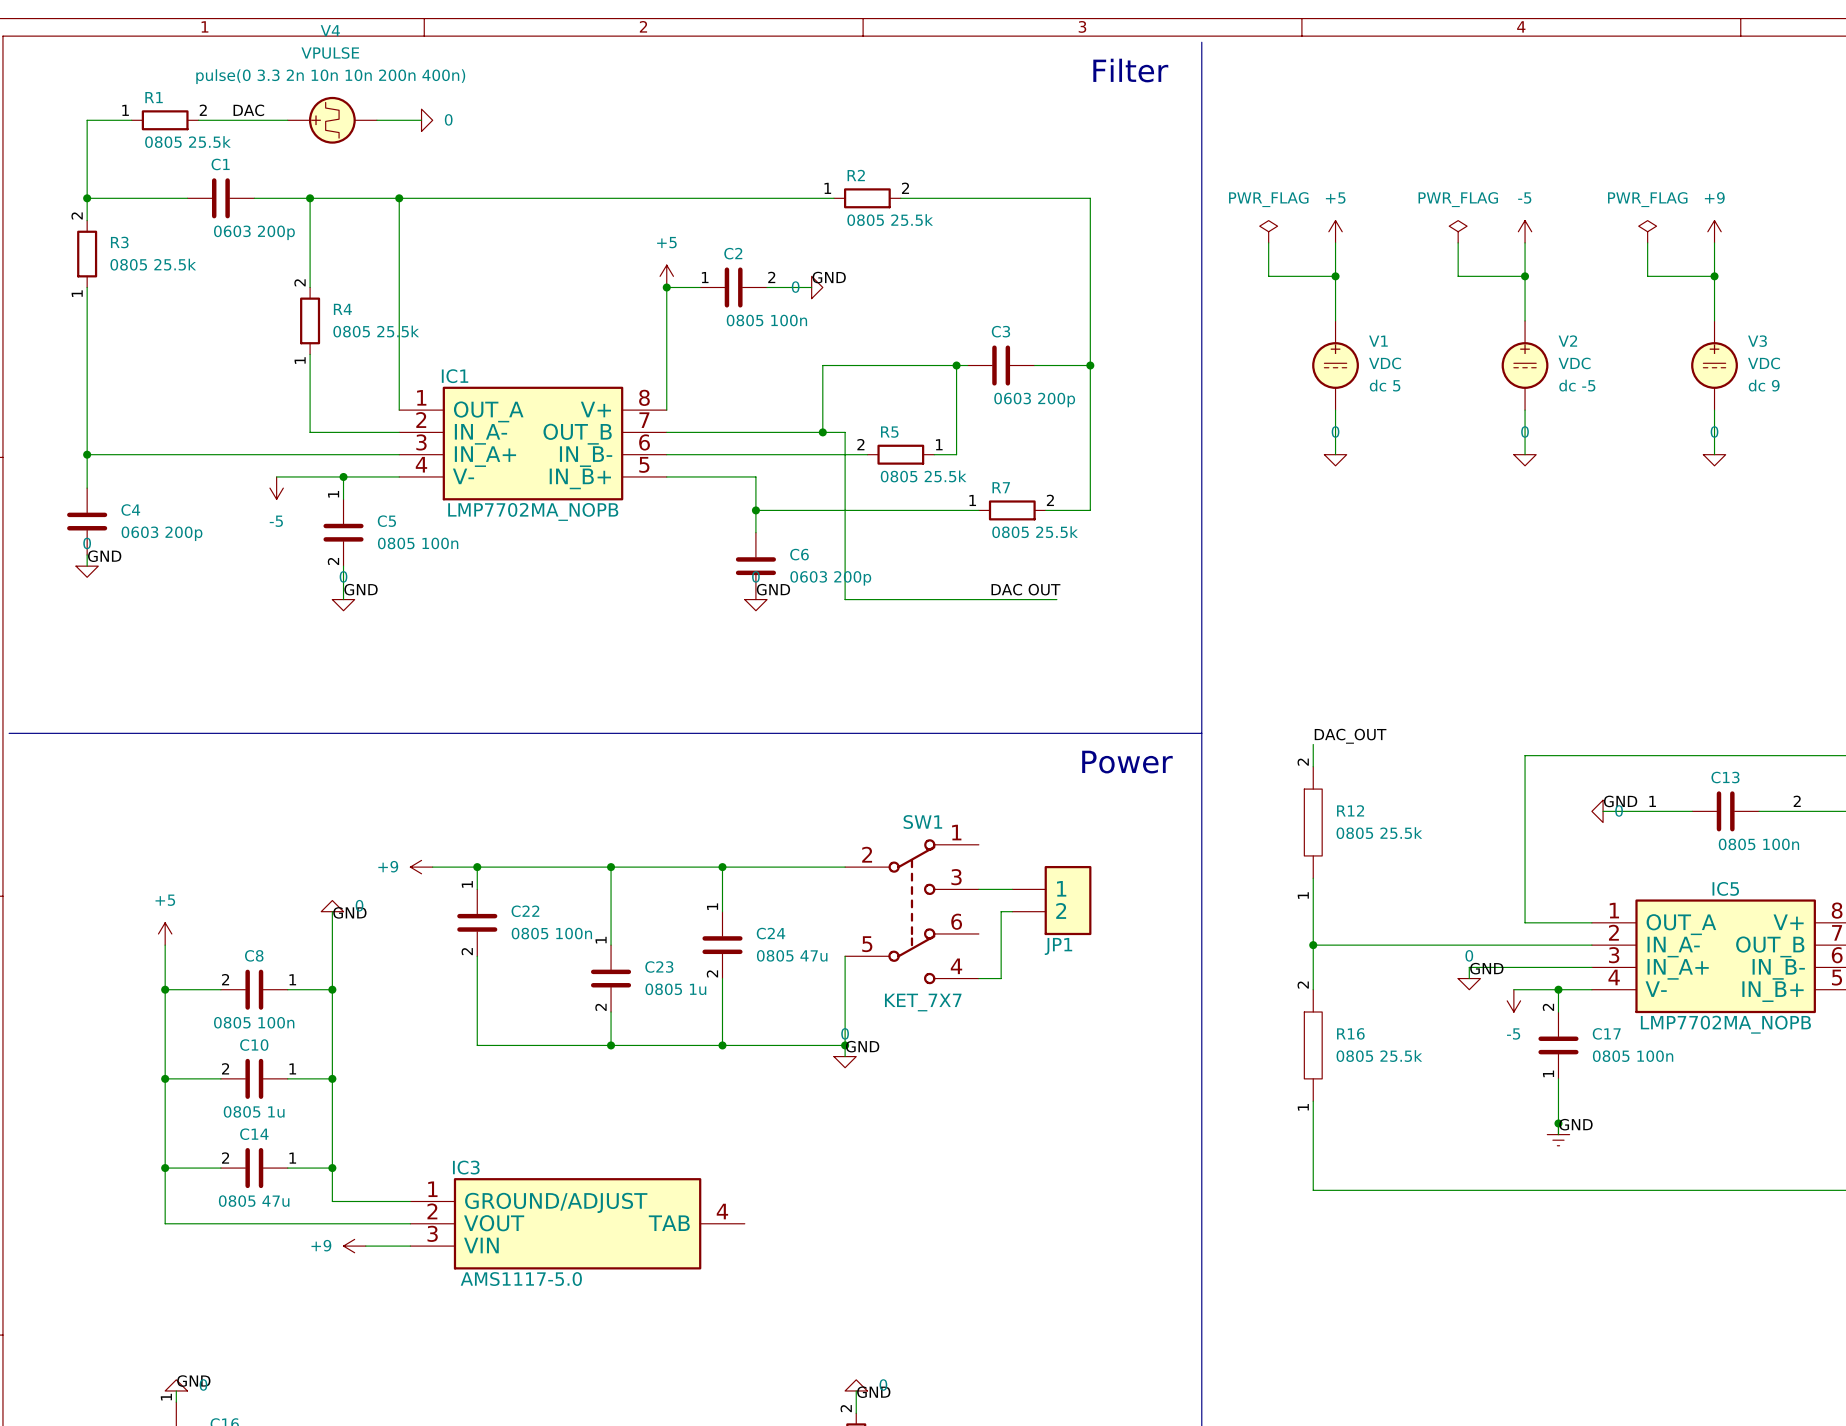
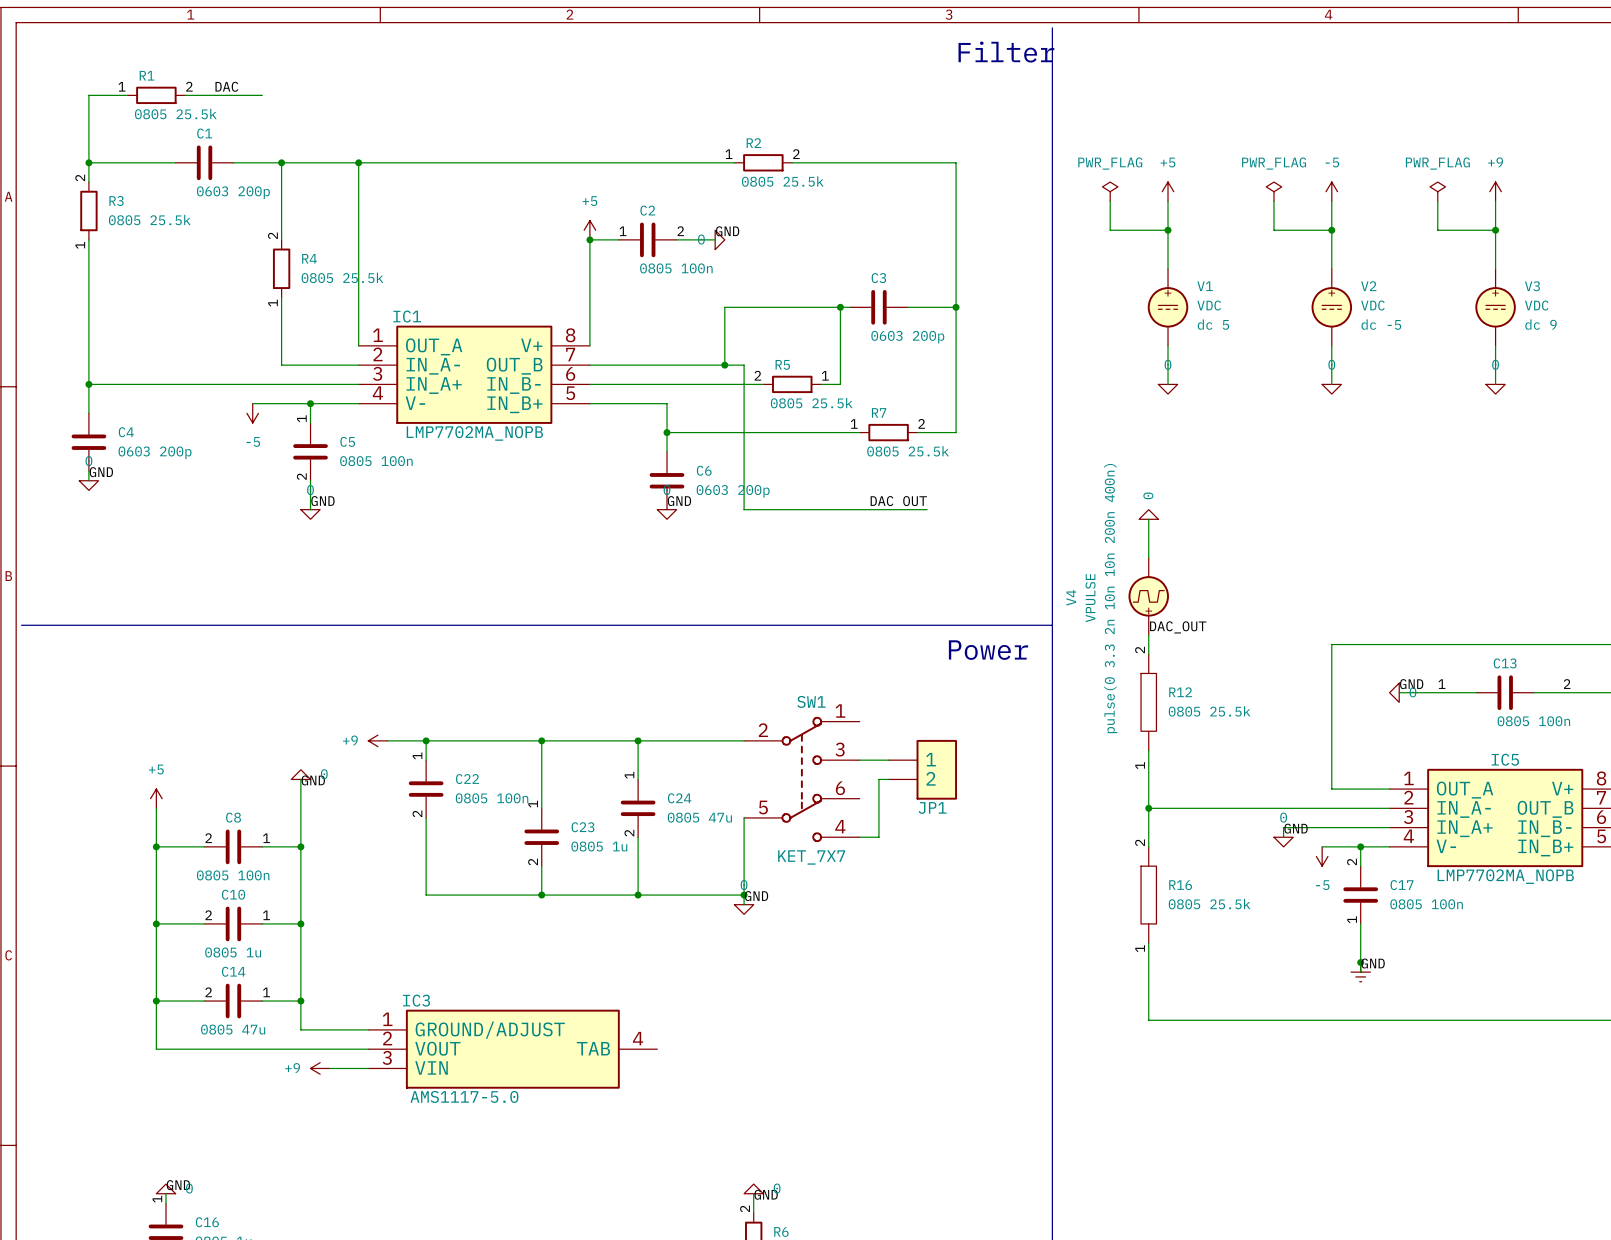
V4 rotation: 0° (332, 120) -> 90° counterclockwise (1148, 596)
V4 position: (332, 120) -> (1148, 596)
wire: (376, 120) (421, 120) -> none
power symbol: 0 (427, 120) -> none
power symbol: none -> 0 (1148, 514)
wire: none -> (1148, 519) (1148, 557)

